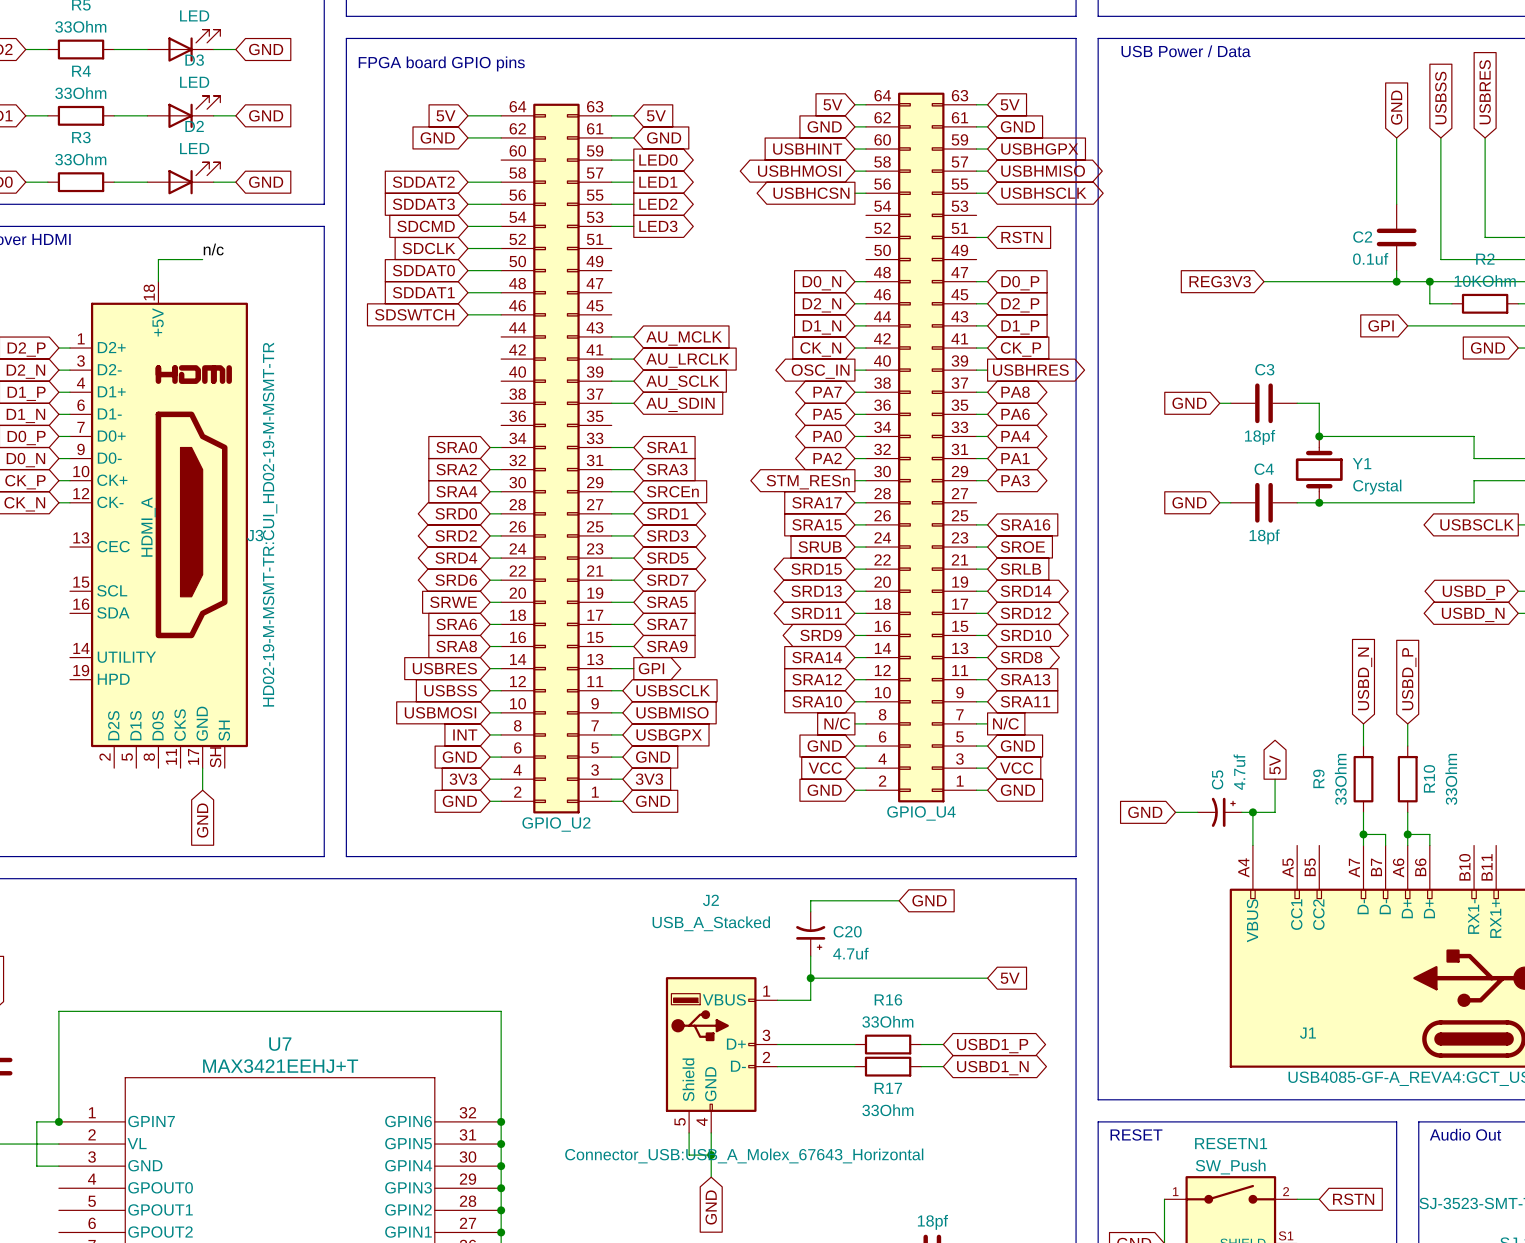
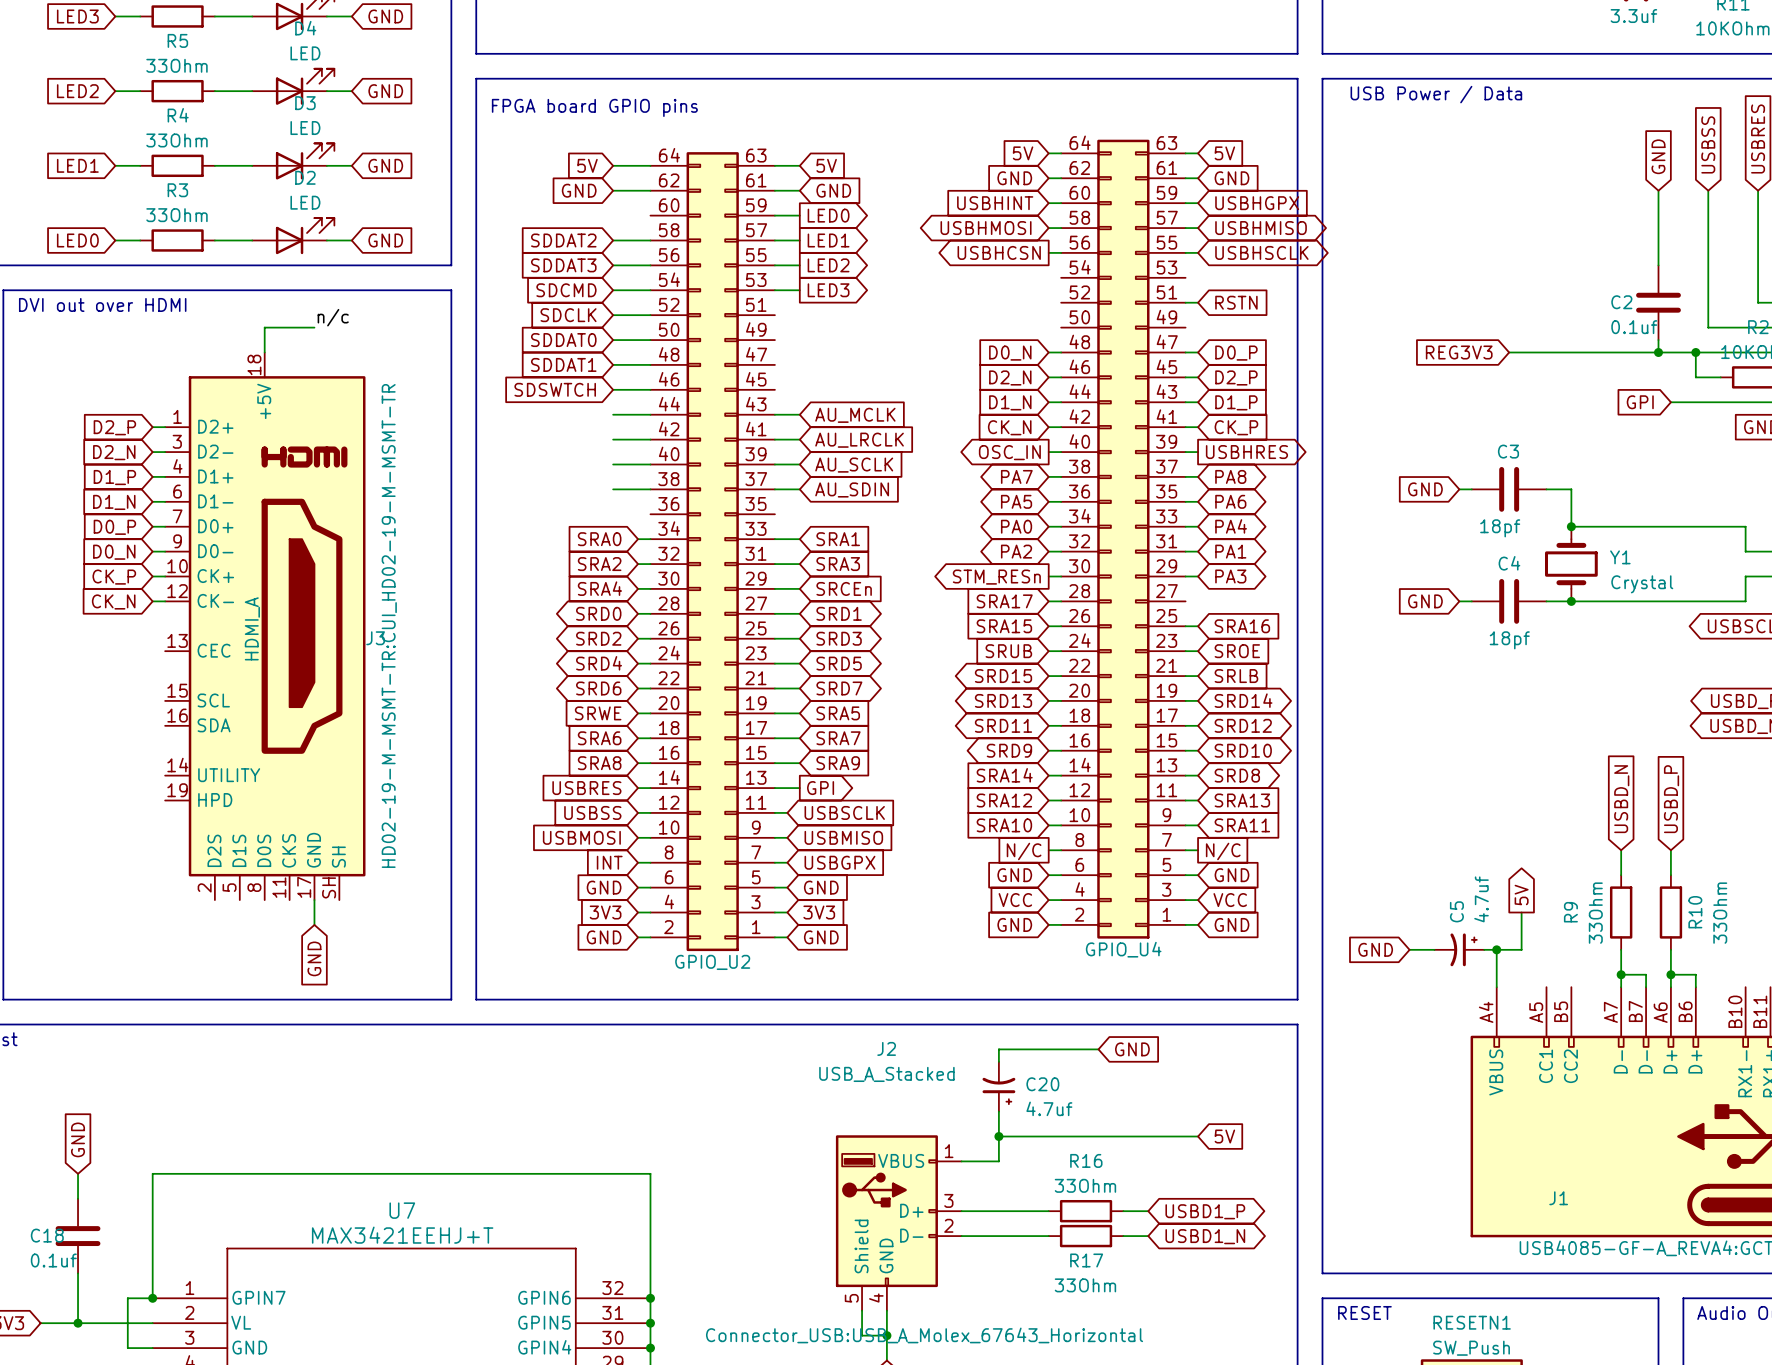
wire: none -> (613, 414) (650, 414)
wire: none -> (613, 439) (650, 439)
wire: none -> (613, 464) (650, 464)
wire: none -> (613, 489) (650, 489)

